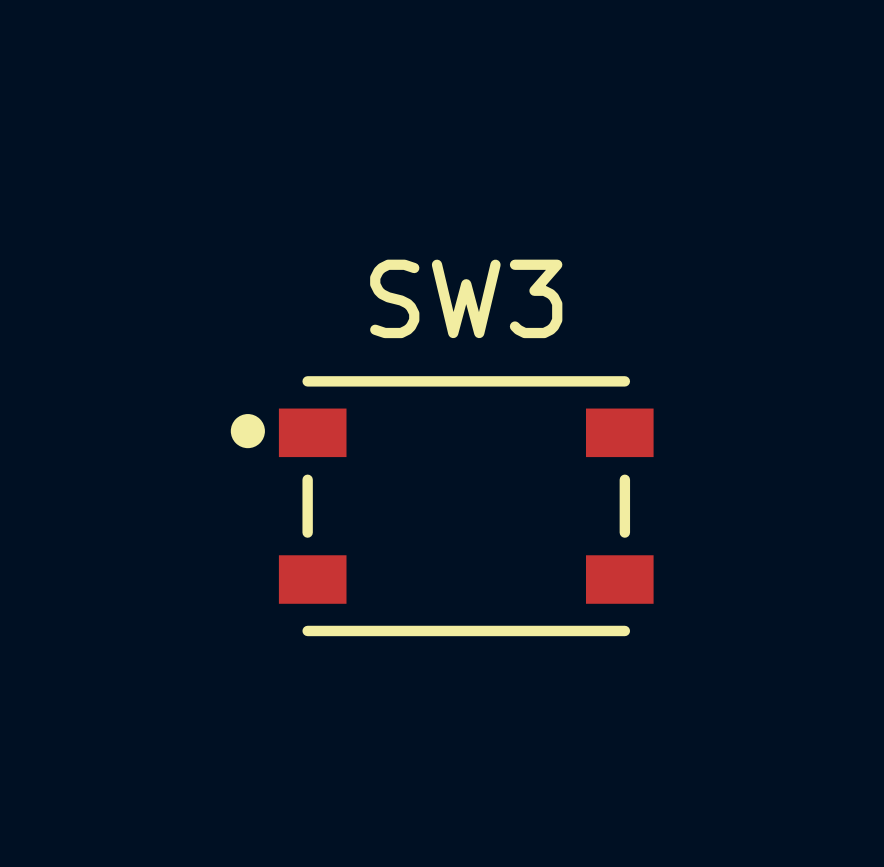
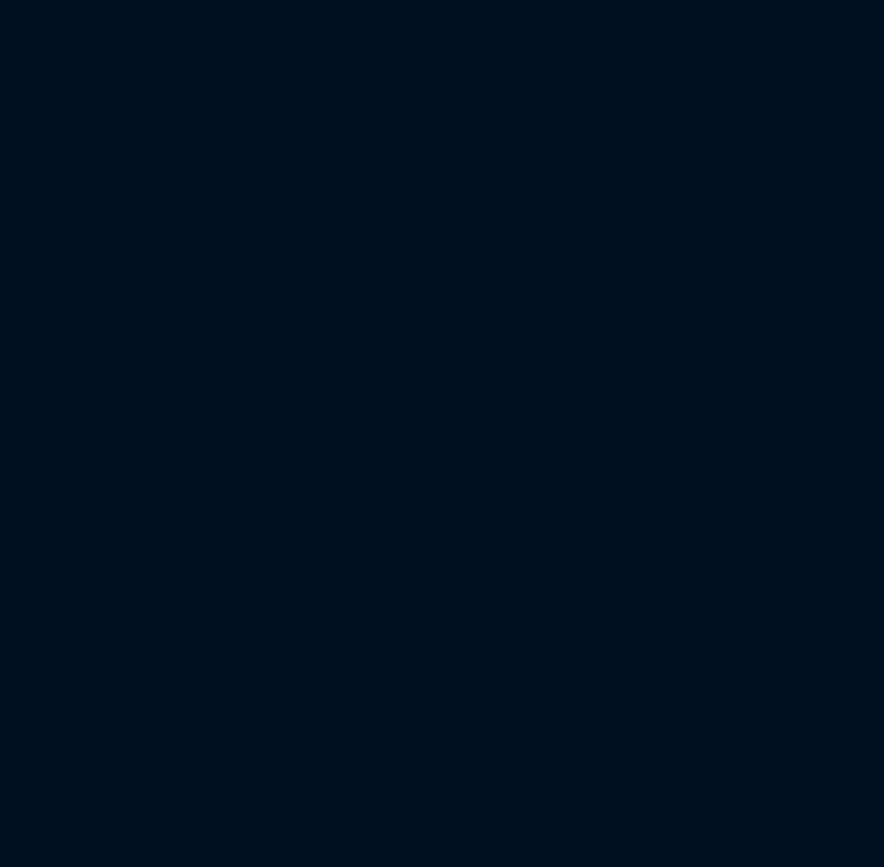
SW3: (442, 506) -> none

